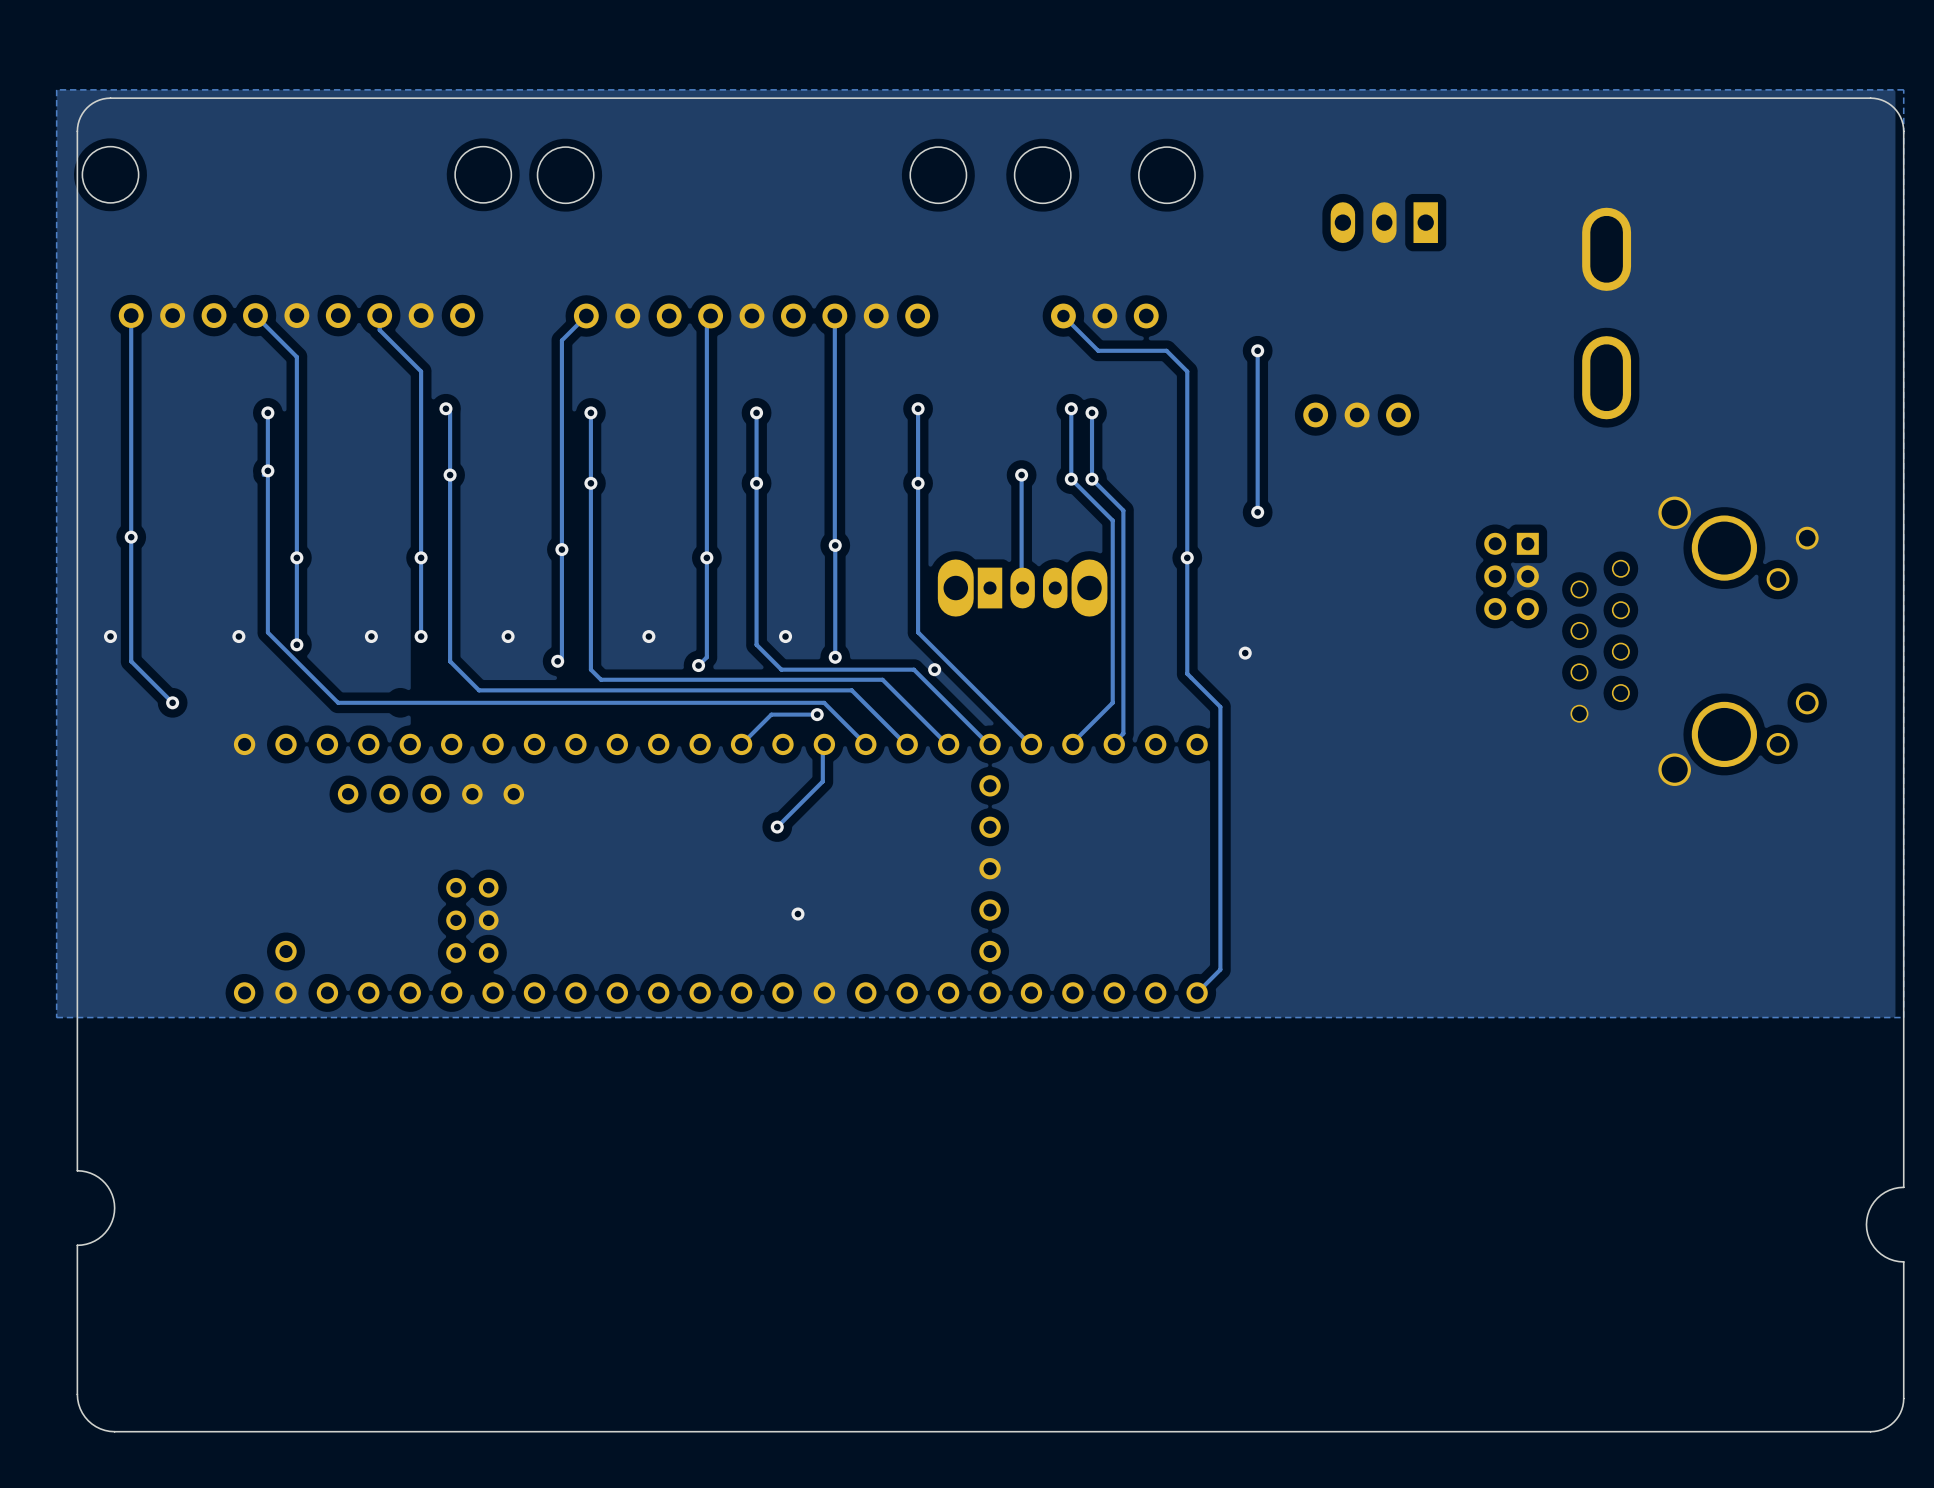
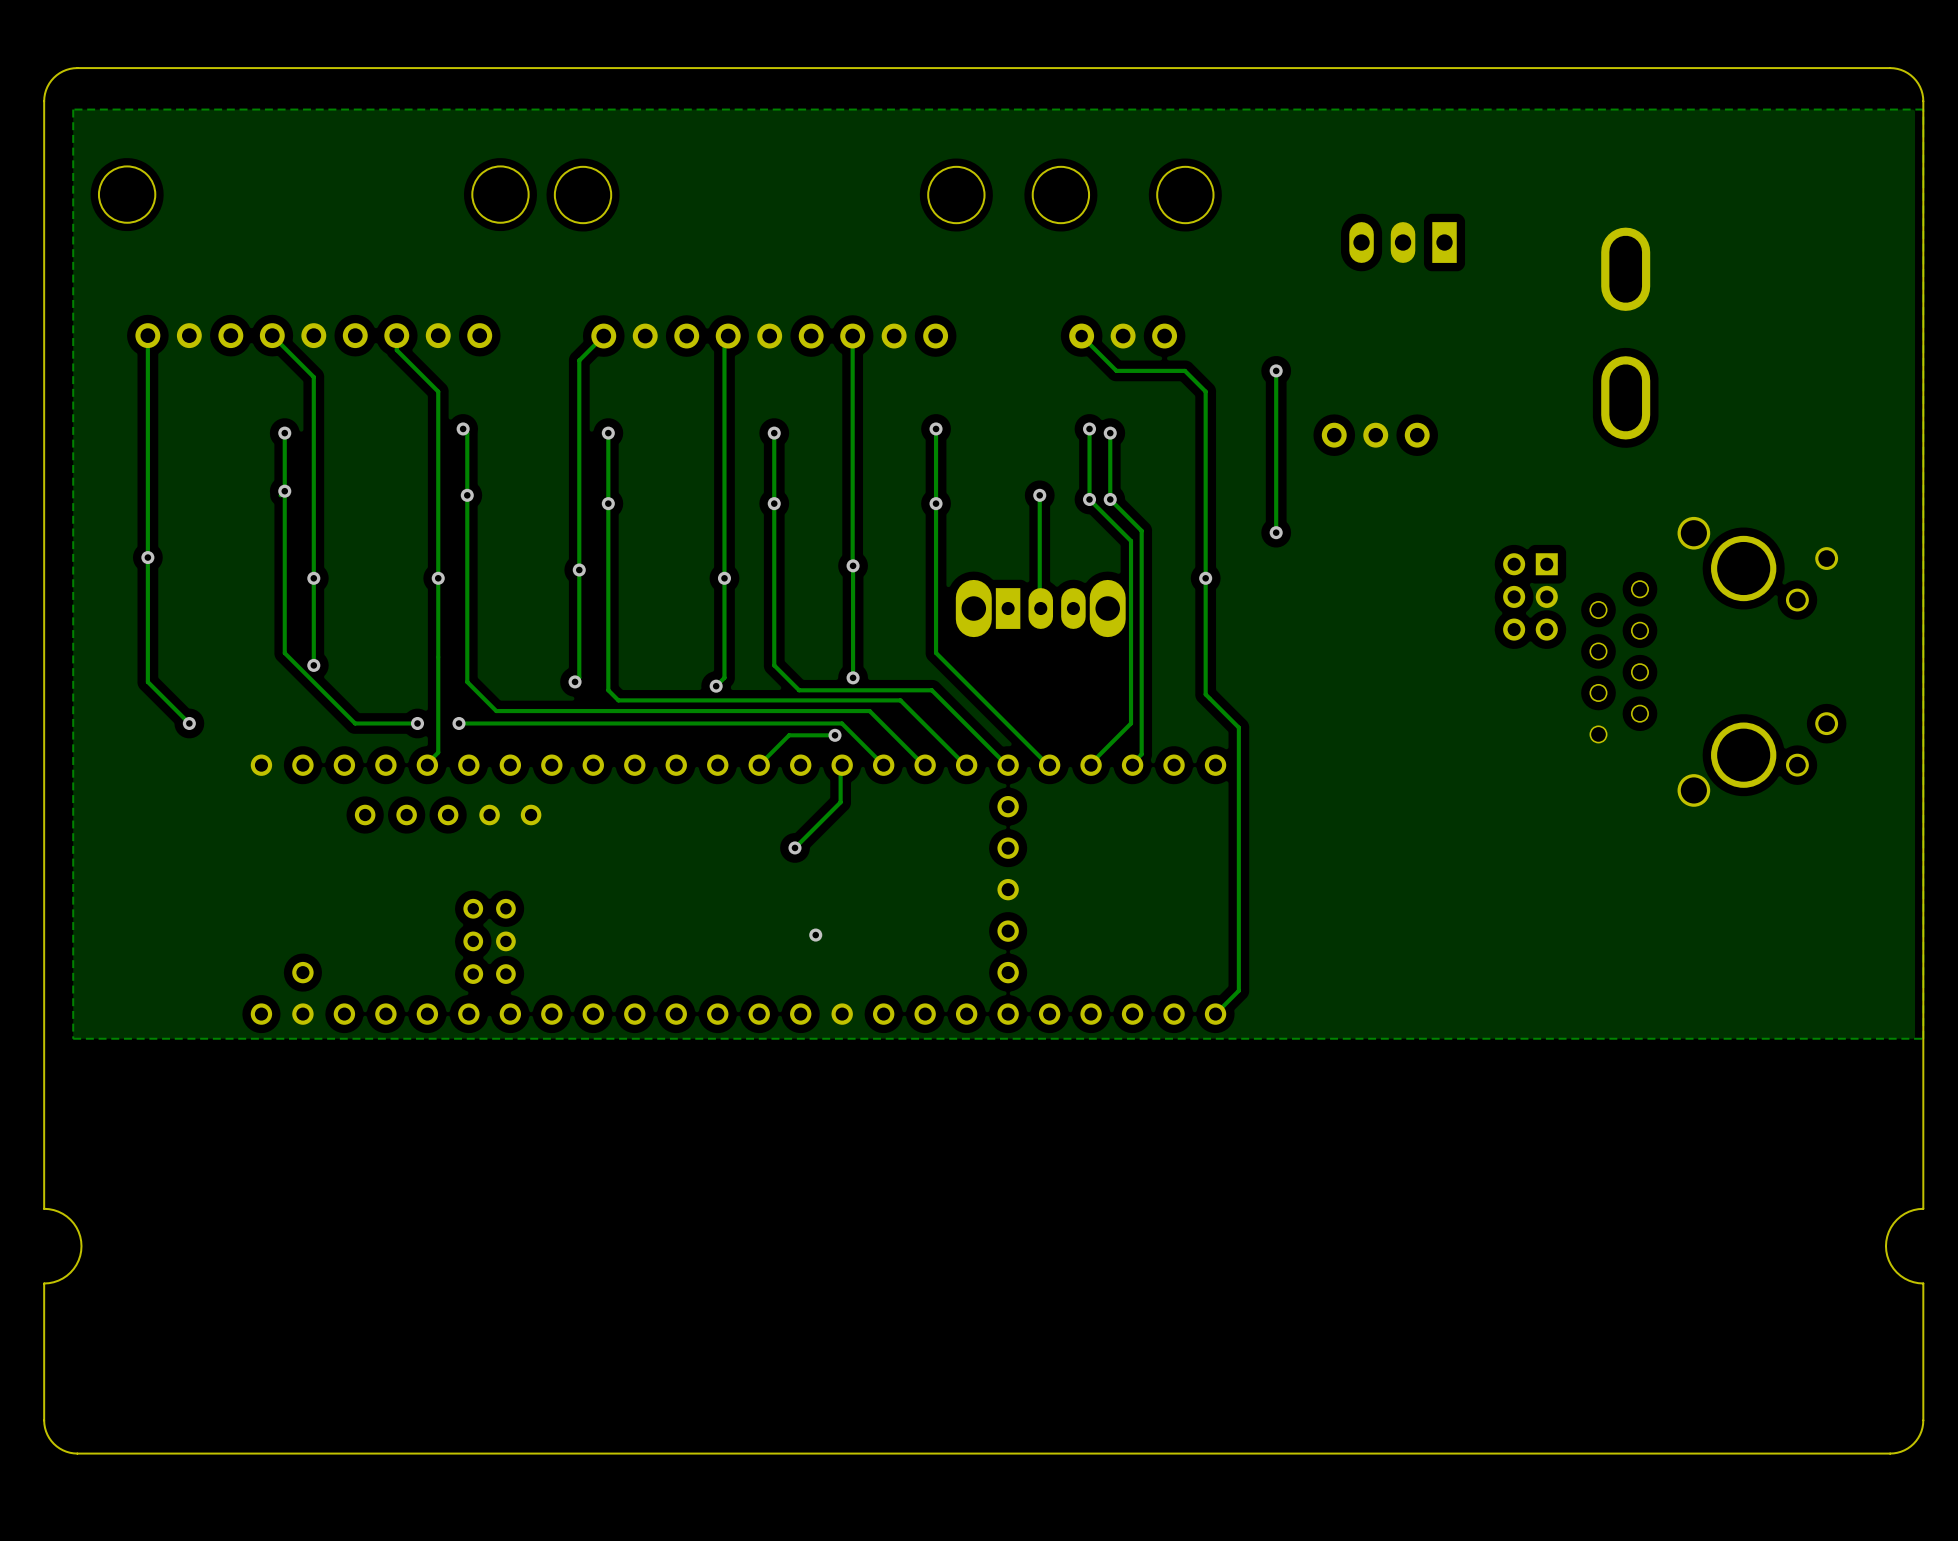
board edge: (1903, 131) (1901, 120) (1894, 107) (1884, 101) (1870, 98) (110, 98) (99, 100) (89, 105) (80, 116) (77, 131) (77, 1170) (94, 1175) (105, 1183) (112, 1194) (114, 1208) (110, 1225) (102, 1235) (90, 1242) (77, 1245) (77, 1394) (80, 1408) (88, 1420) (100, 1428) (114, 1431) -> (1923, 151) (1923, 101) (1921, 90) (1910, 75) (1901, 69) (1890, 68) (77, 68) (66, 69) (56, 75) (47, 86) (44, 101) (44, 1208) (58, 1211) (70, 1219) (78, 1231) (81, 1246) (78, 1260) (70, 1272) (58, 1280) (44, 1283) (44, 1420) (49, 1438) (56, 1446) (66, 1451) (77, 1453) (131, 1453)
via: (110, 636) -> none
via: (238, 636) -> none
via: (371, 636) -> none
track: none -> (438, 657) (438, 752) (425, 764)
via: (421, 636) -> none
via: (508, 636) -> none
via: (648, 636) -> none
via: (785, 636) -> none
via: (1245, 653) -> none
via: (934, 669) -> none
via: none -> (417, 723)
track: (441, 702) (400, 702) -> none
via: none -> (458, 723)

